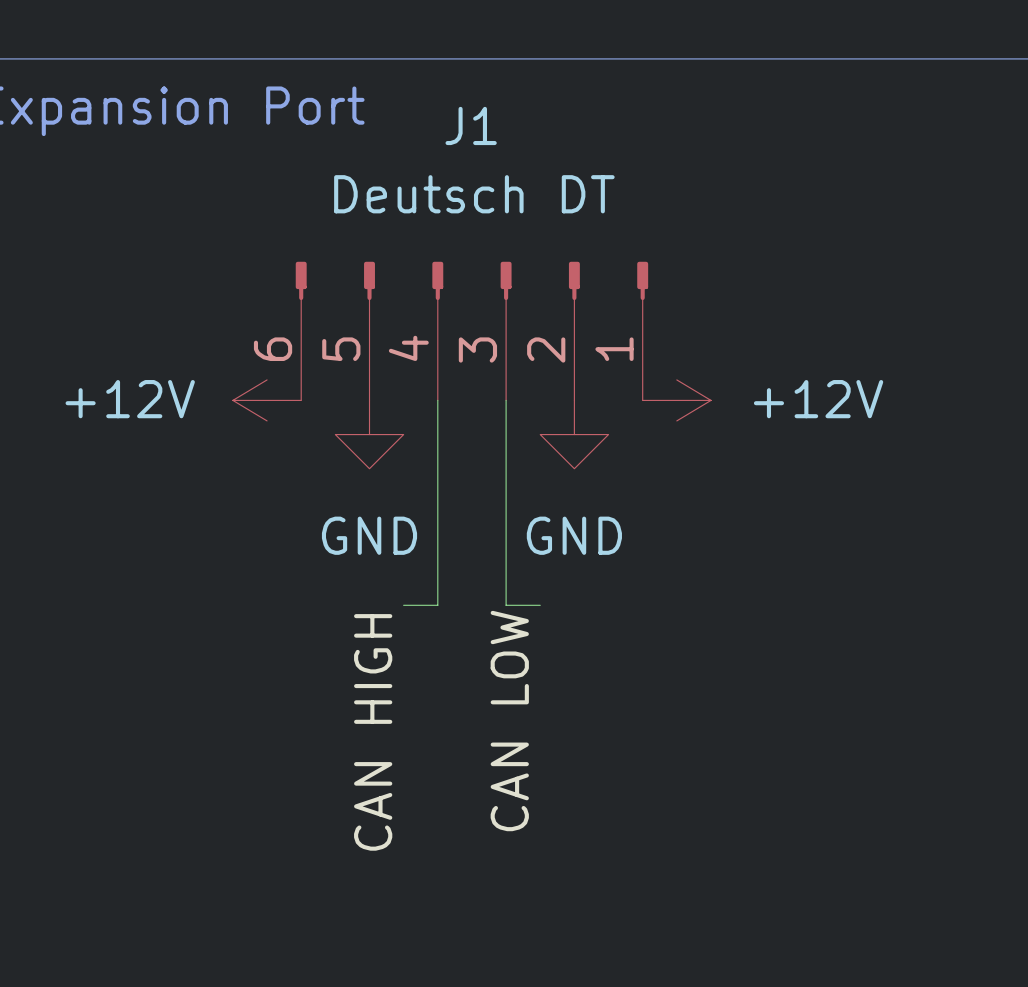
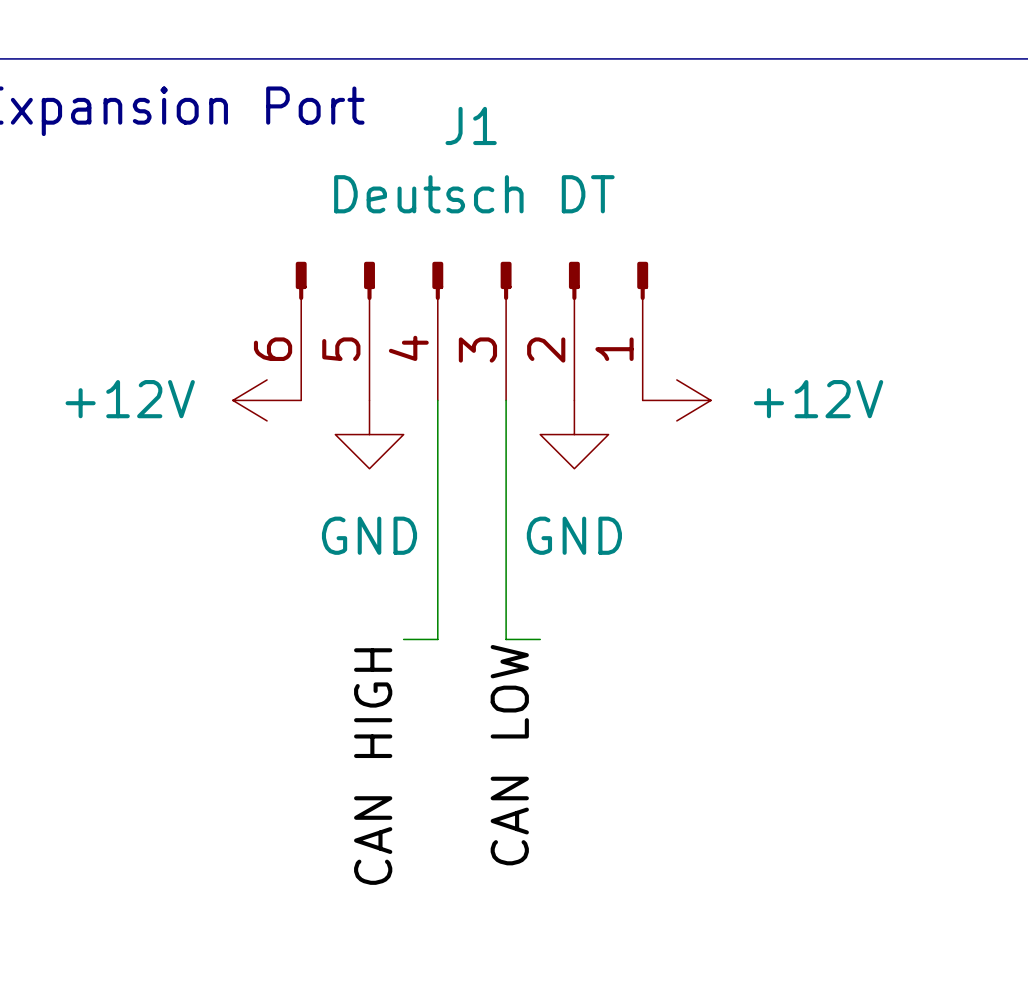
wire: (403, 605) (437, 605) -> (403, 639) (437, 639) (437, 605)
wire: (506, 605) (540, 605) -> (506, 605) (506, 639) (540, 639)
label position: CAN LOW (509, 721) -> CAN LOW (509, 755)
label position: CAN HIGH (373, 732) -> CAN HIGH (373, 766)

